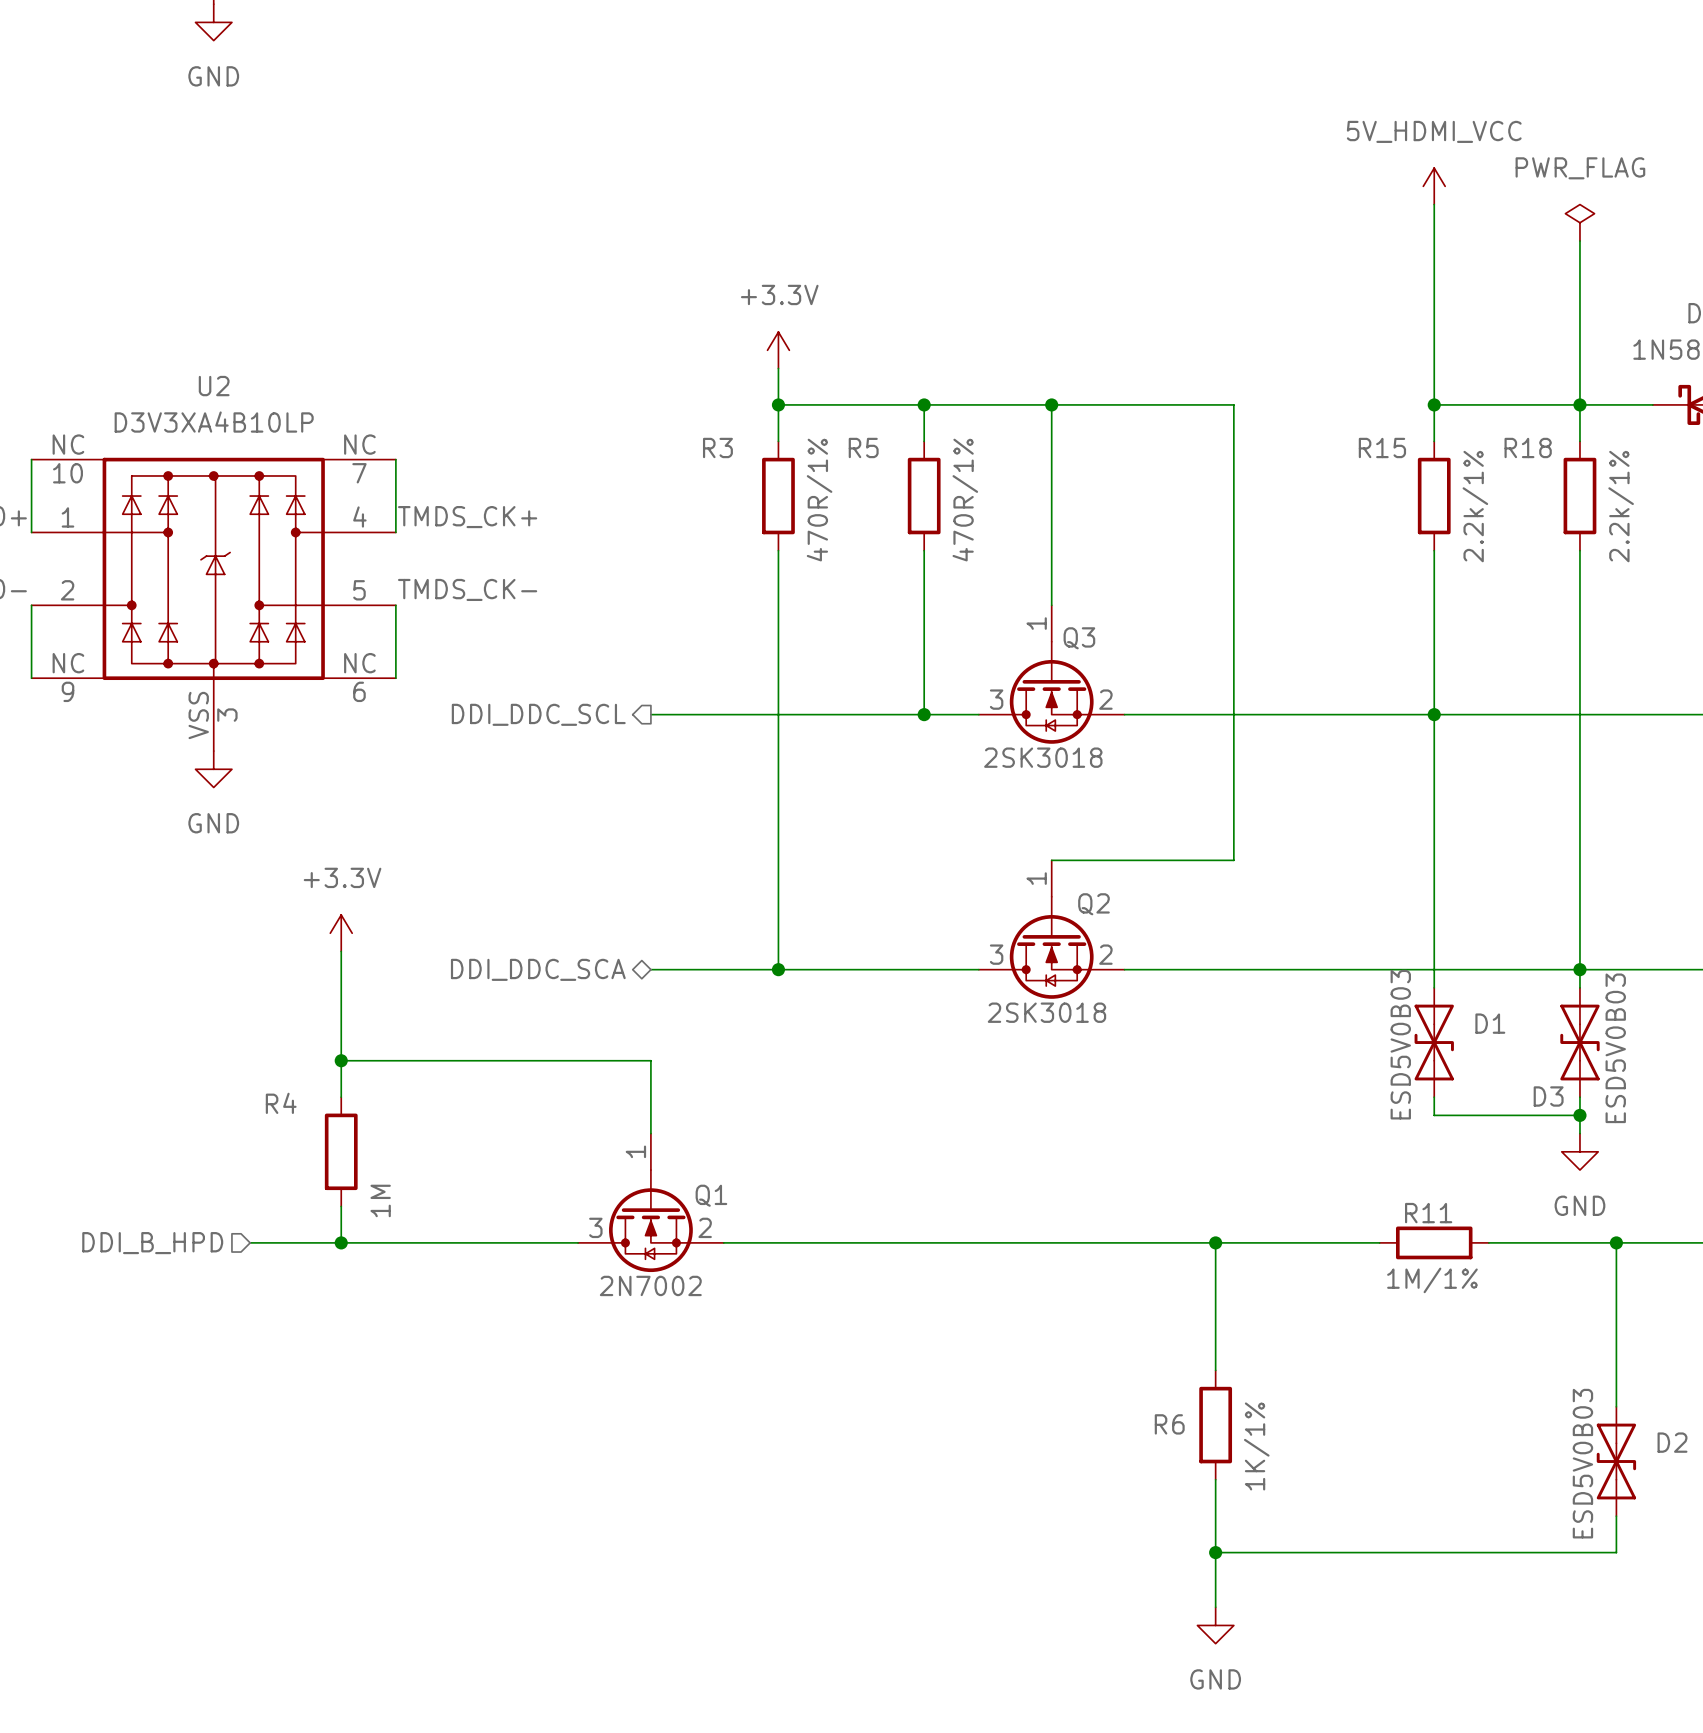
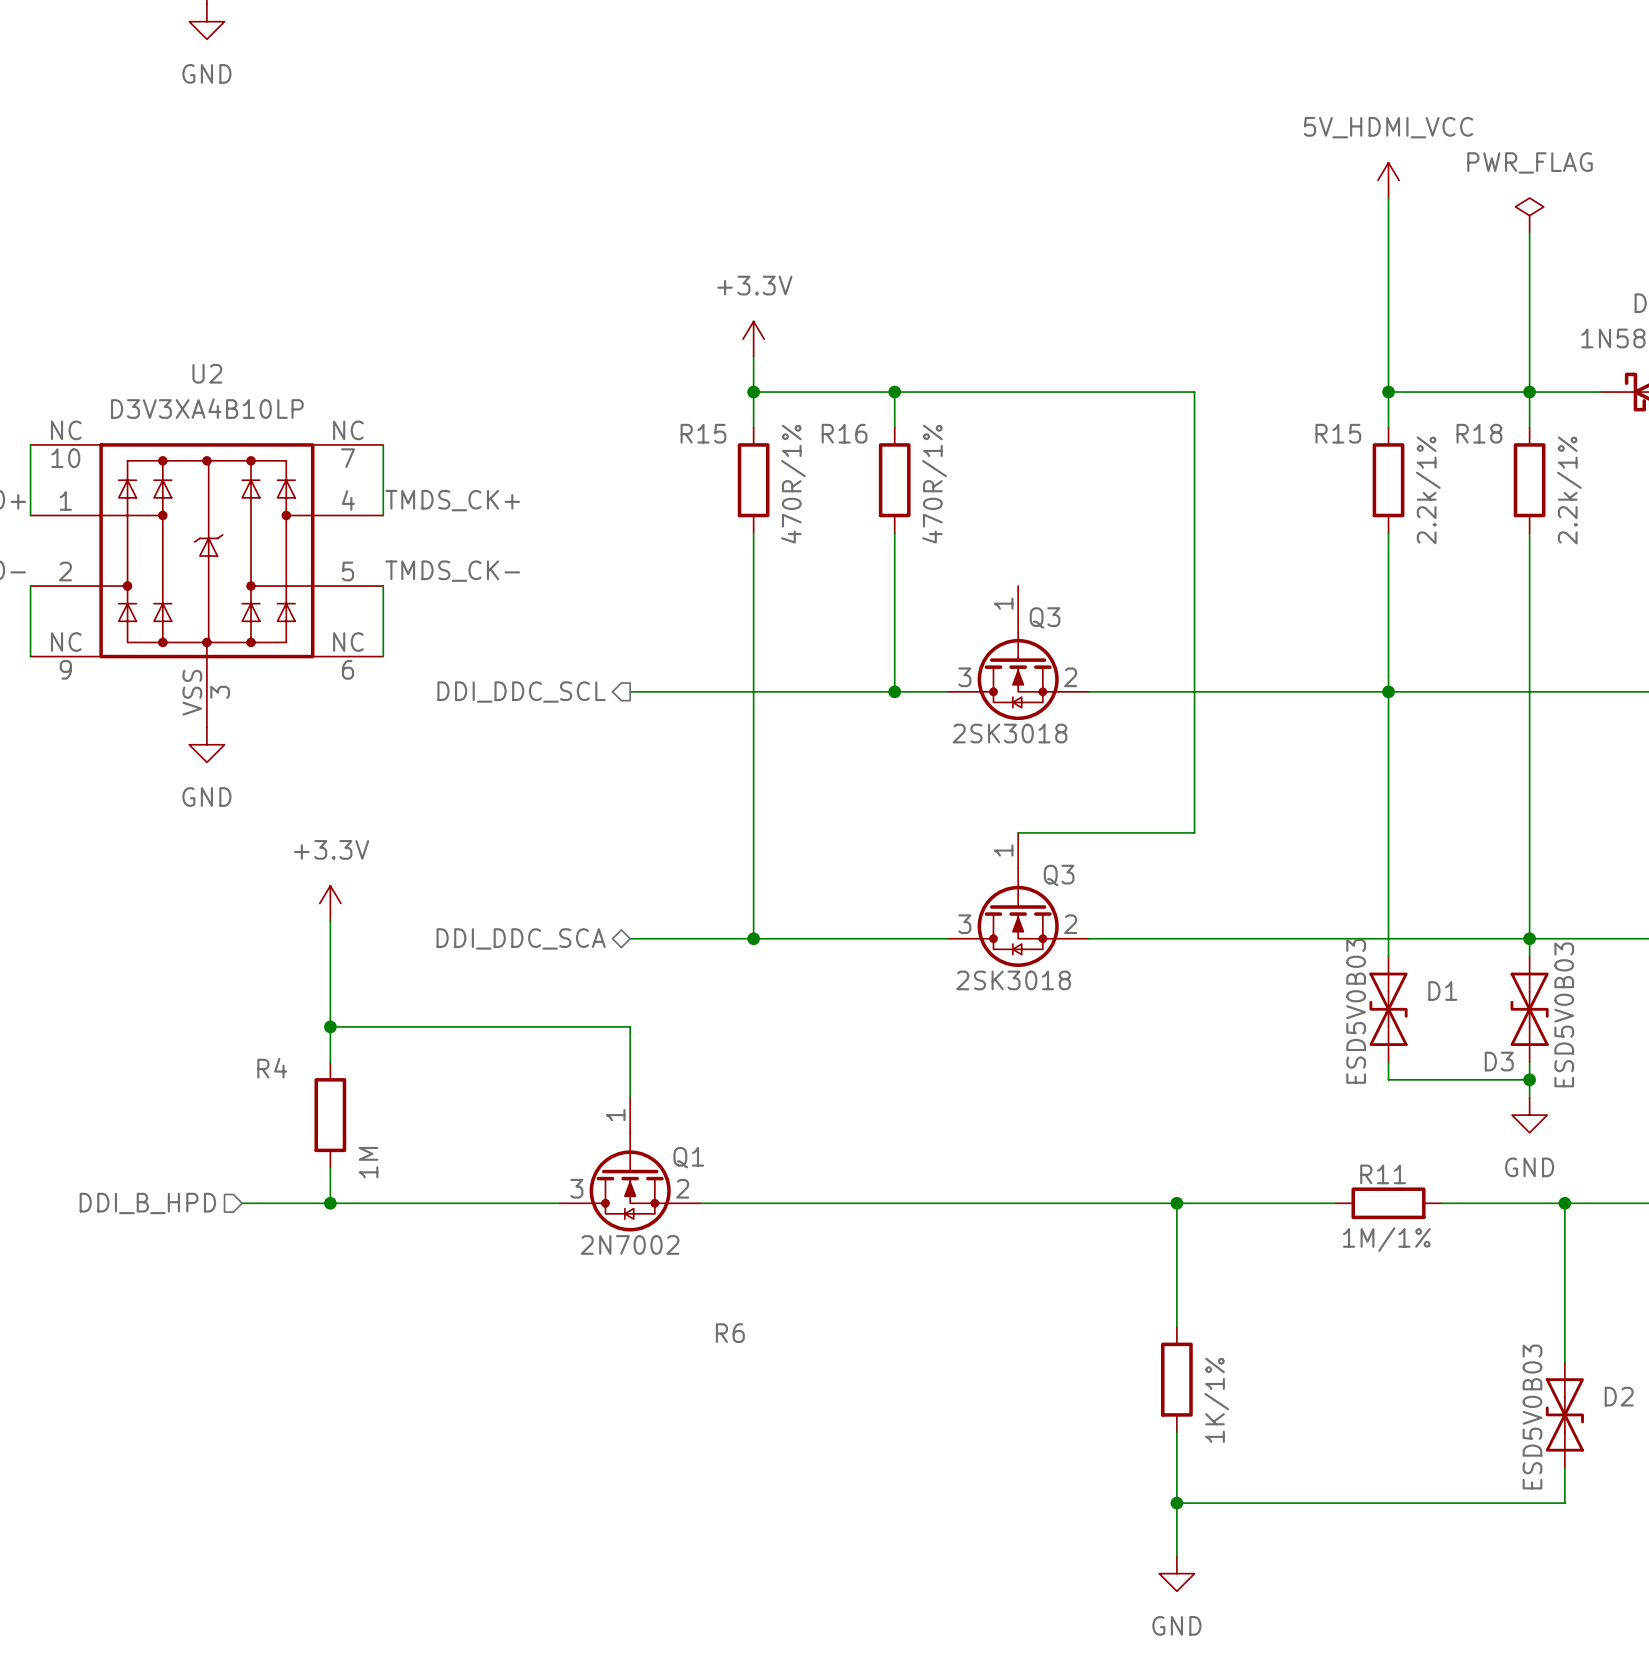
wire: (1051, 404) (1051, 605) -> none
junction: (1051, 404) -> none
R3 name: R3 (717, 447) -> R15 (703, 433)
R5 name: R5 (863, 447) -> R16 (844, 433)
Q2 name: Q2 (1093, 904) -> Q3 (1059, 875)
R6 name position: R6 (1169, 1424) -> R6 (730, 1333)

